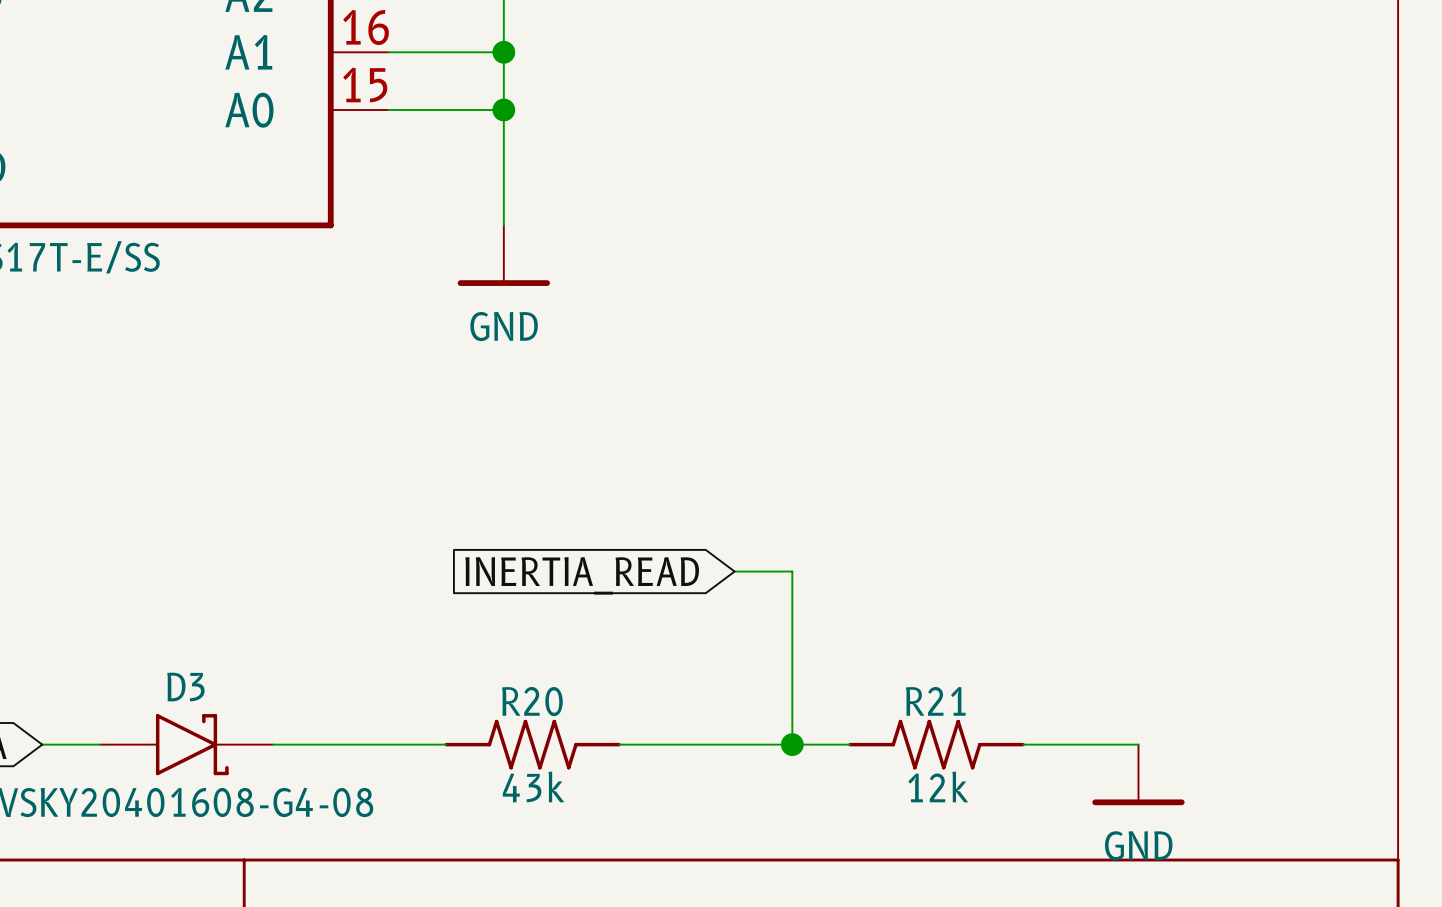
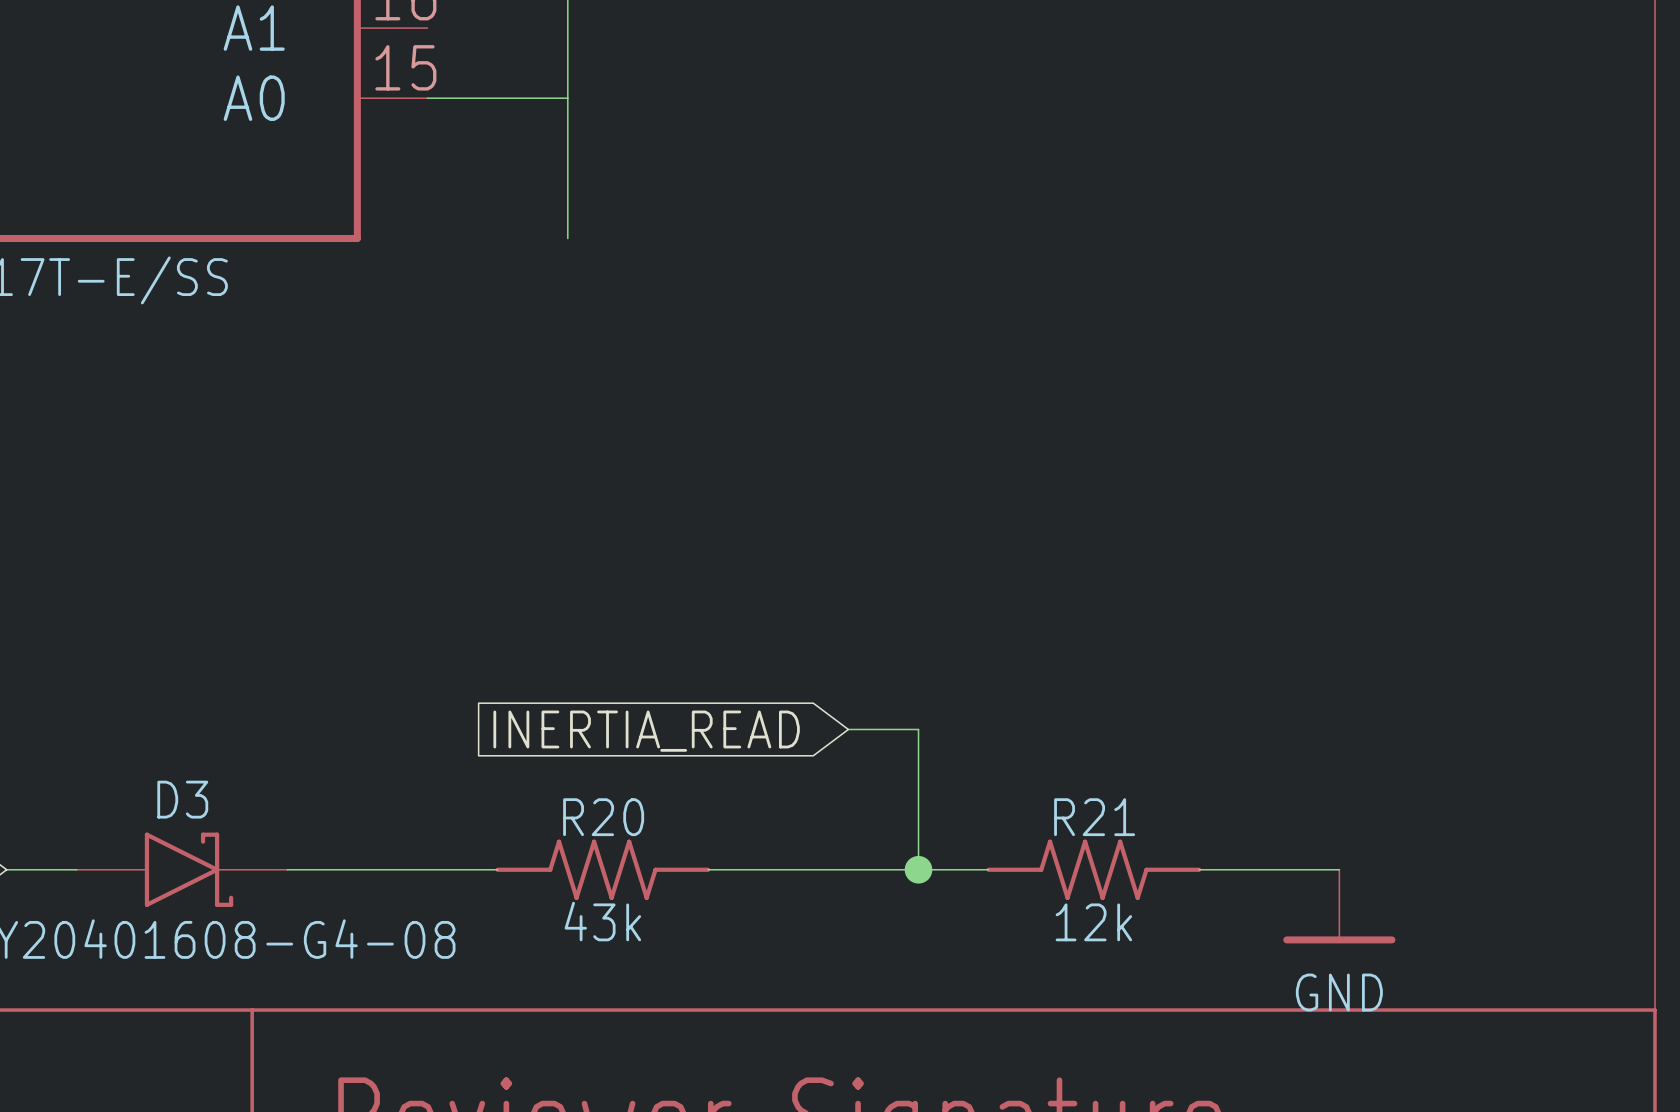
wire: (388, 52) (503, 52) -> none
junction: (503, 52) -> none
junction: (503, 109) -> none
power symbol: GND (503, 255) -> none
wire: (734, 571) (792, 571) (792, 629) -> (848, 729) (918, 729)
global label position: INERTIA_READ (582, 575) -> INERTIA_READ (646, 731)

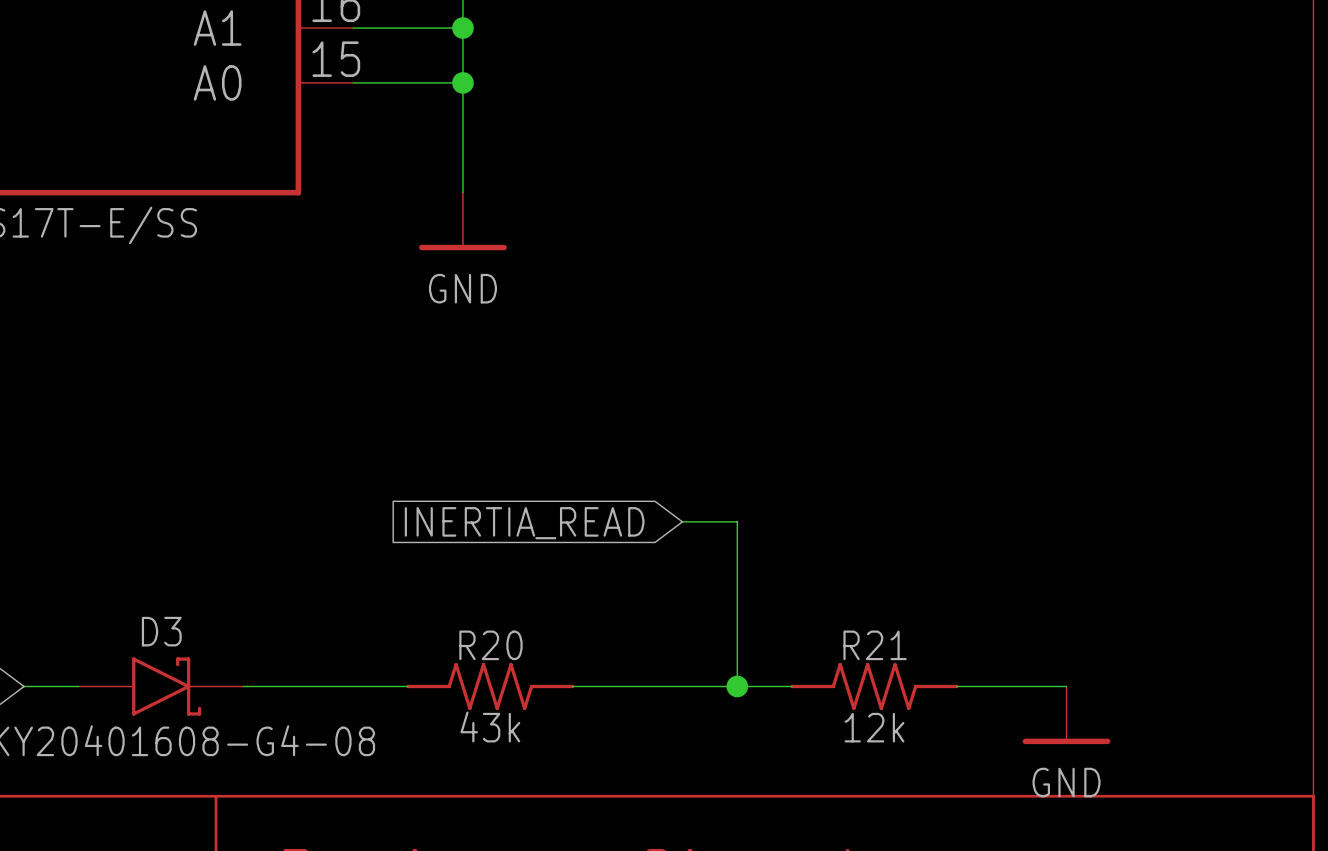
wire: none -> (353, 28) (462, 28)
junction: none -> (462, 28)
junction: none -> (462, 82)
power symbol: none -> GND (462, 221)
wire: (848, 729) (918, 729) -> (682, 521) (737, 521) (737, 576)
global label position: INERTIA_READ (646, 731) -> INERTIA_READ (524, 523)

